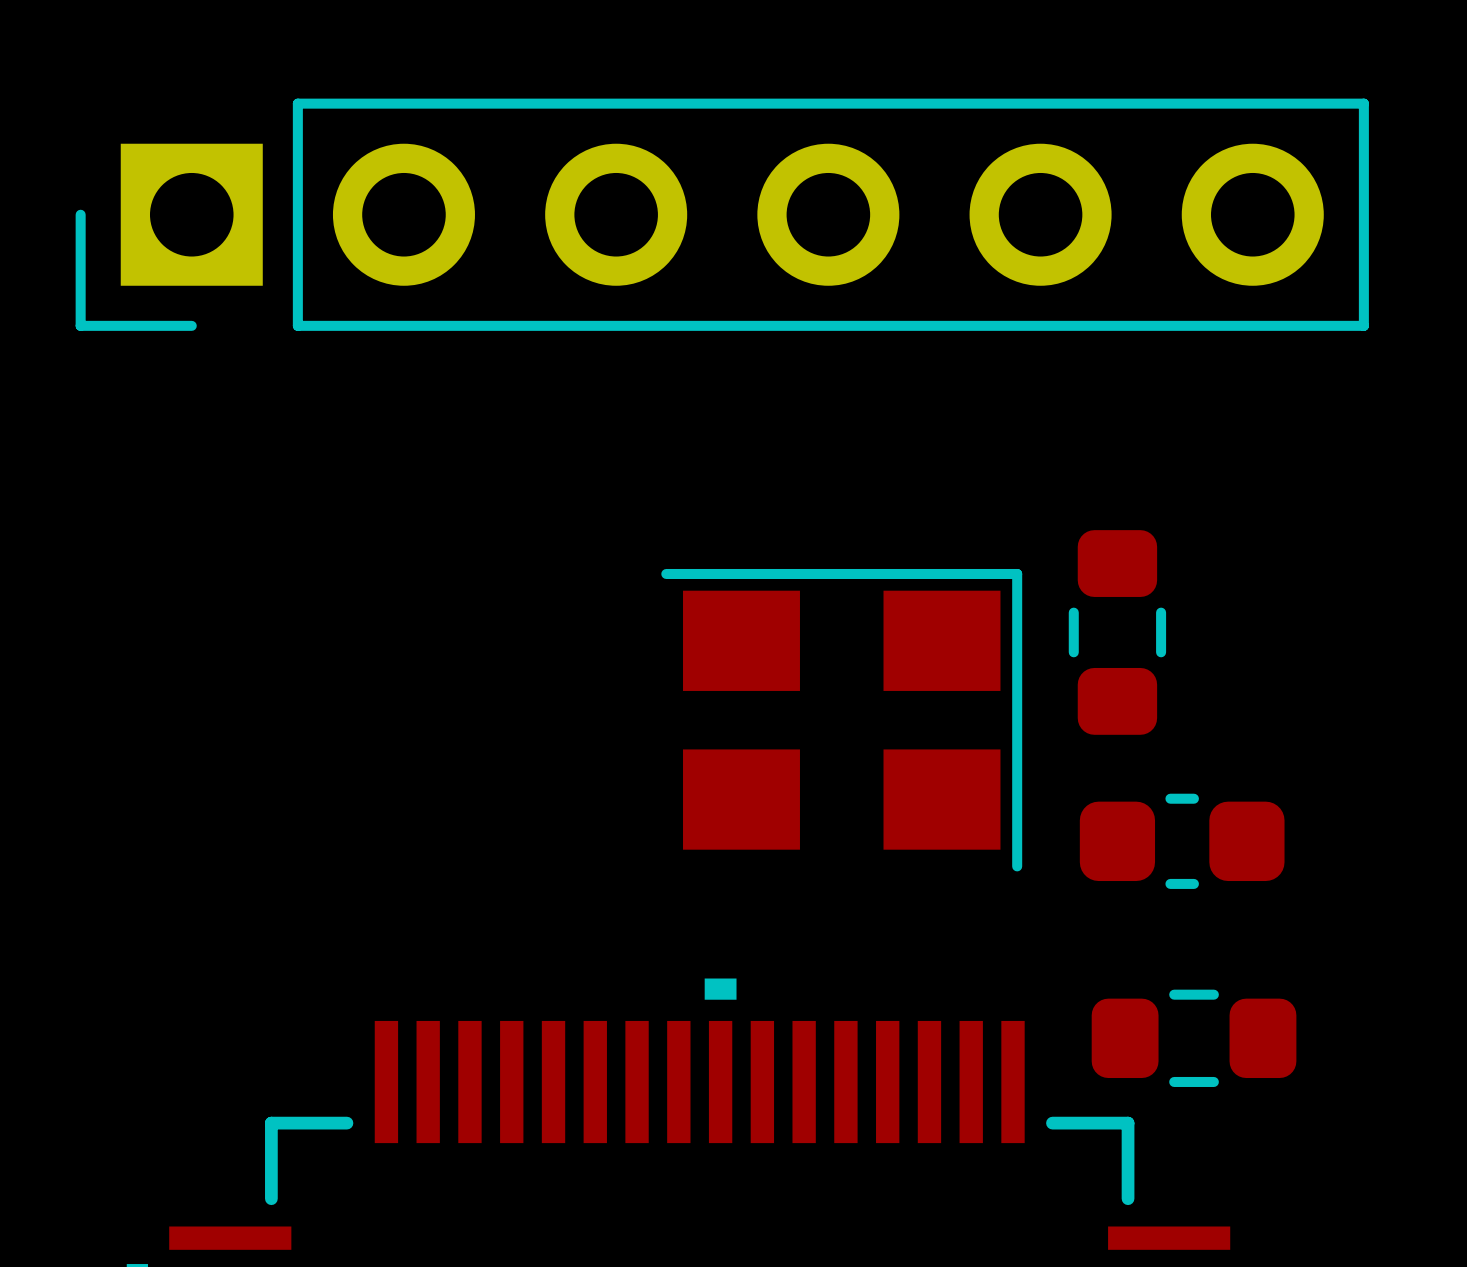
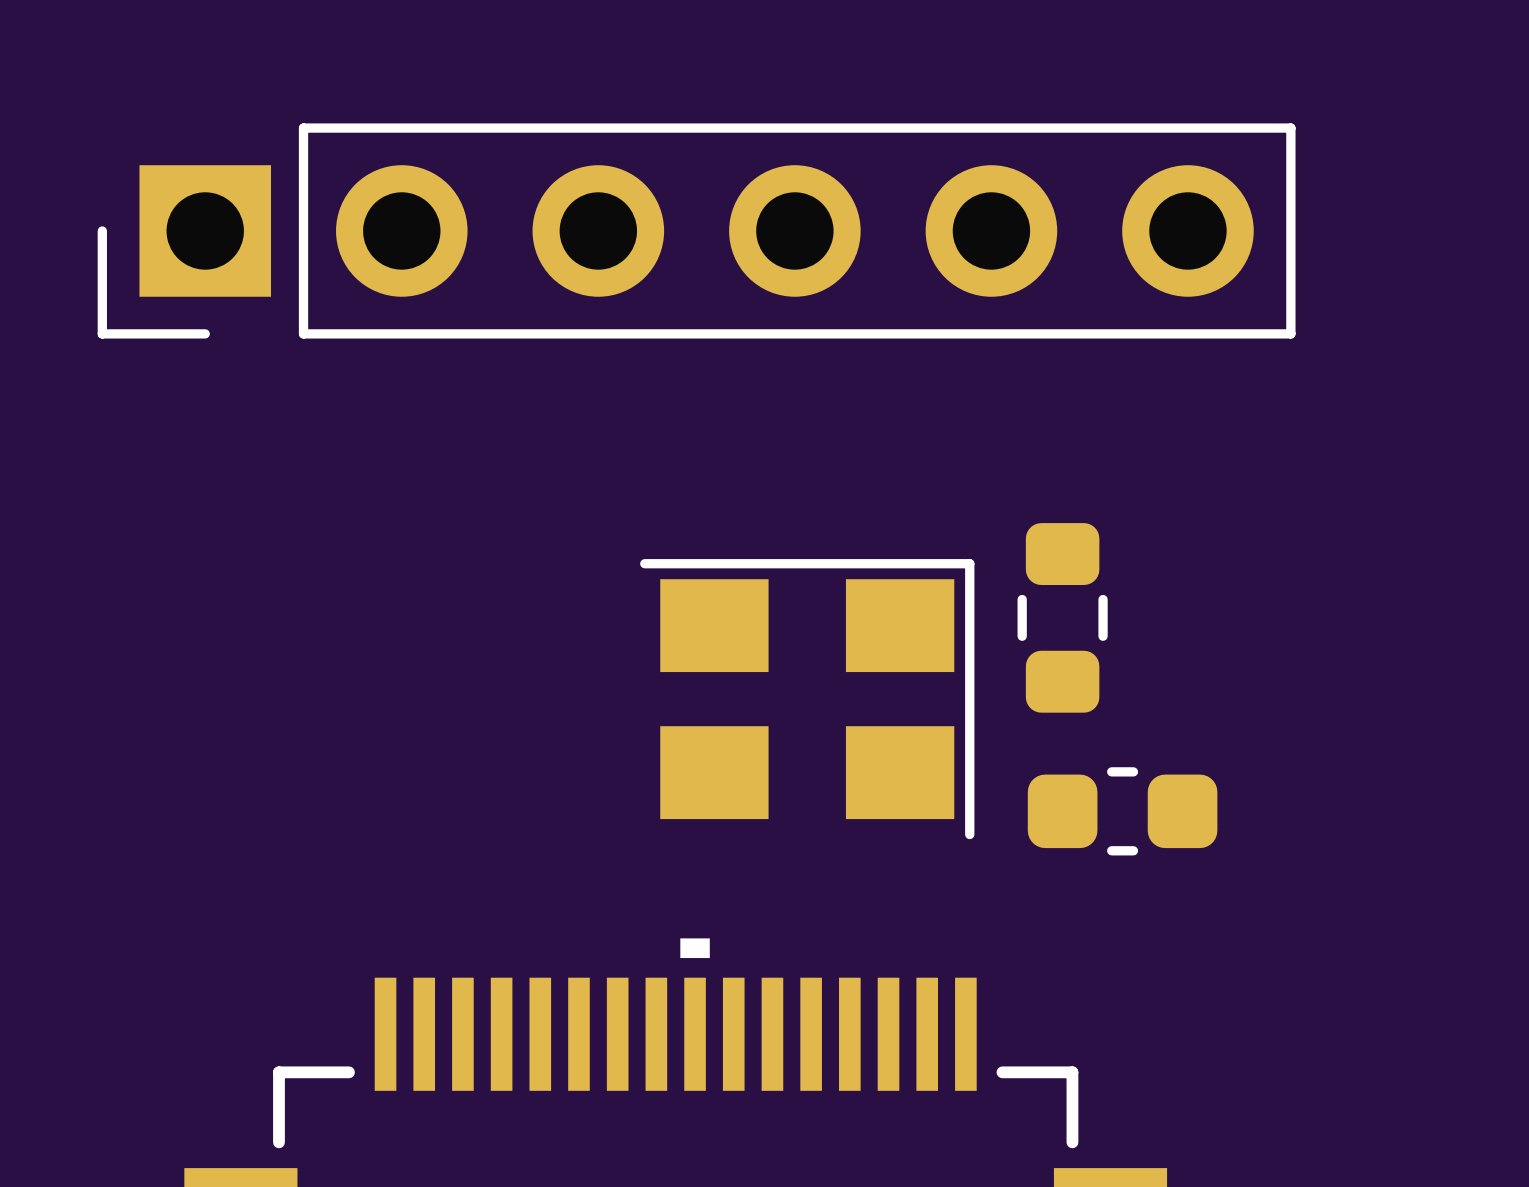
part: (1194, 1038) -> none

